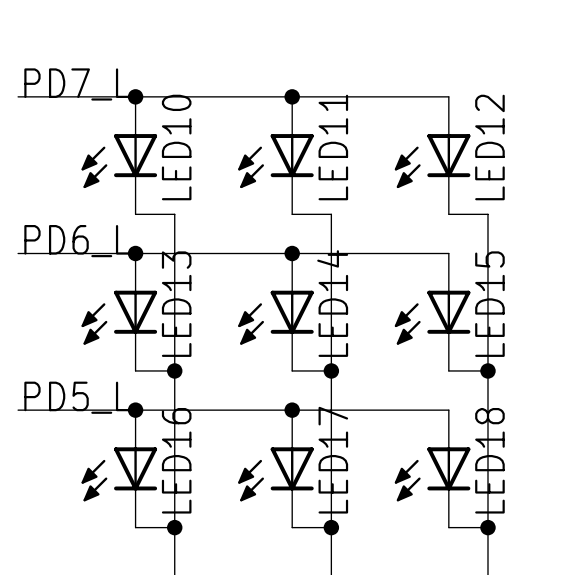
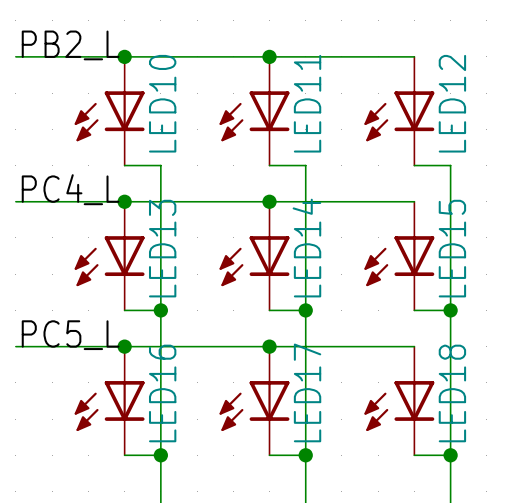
label: PD7_L (77, 84) -> PB2_L (70, 45)
label: PD6_L (77, 241) -> PC4_L (70, 189)
label: PD5_L (77, 397) -> PC5_L (70, 335)

